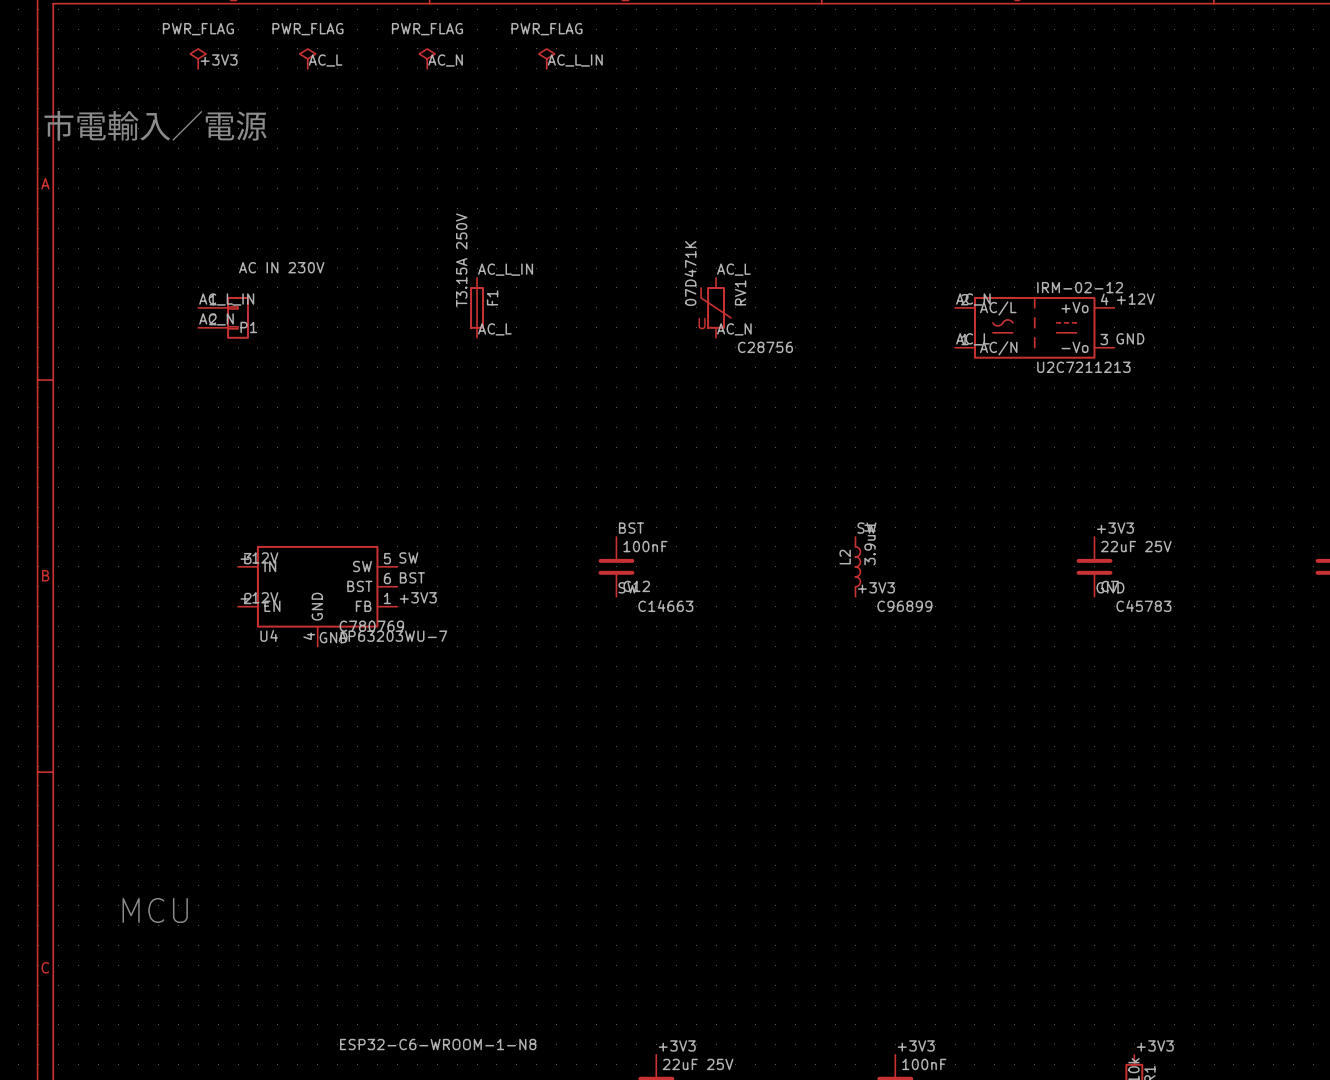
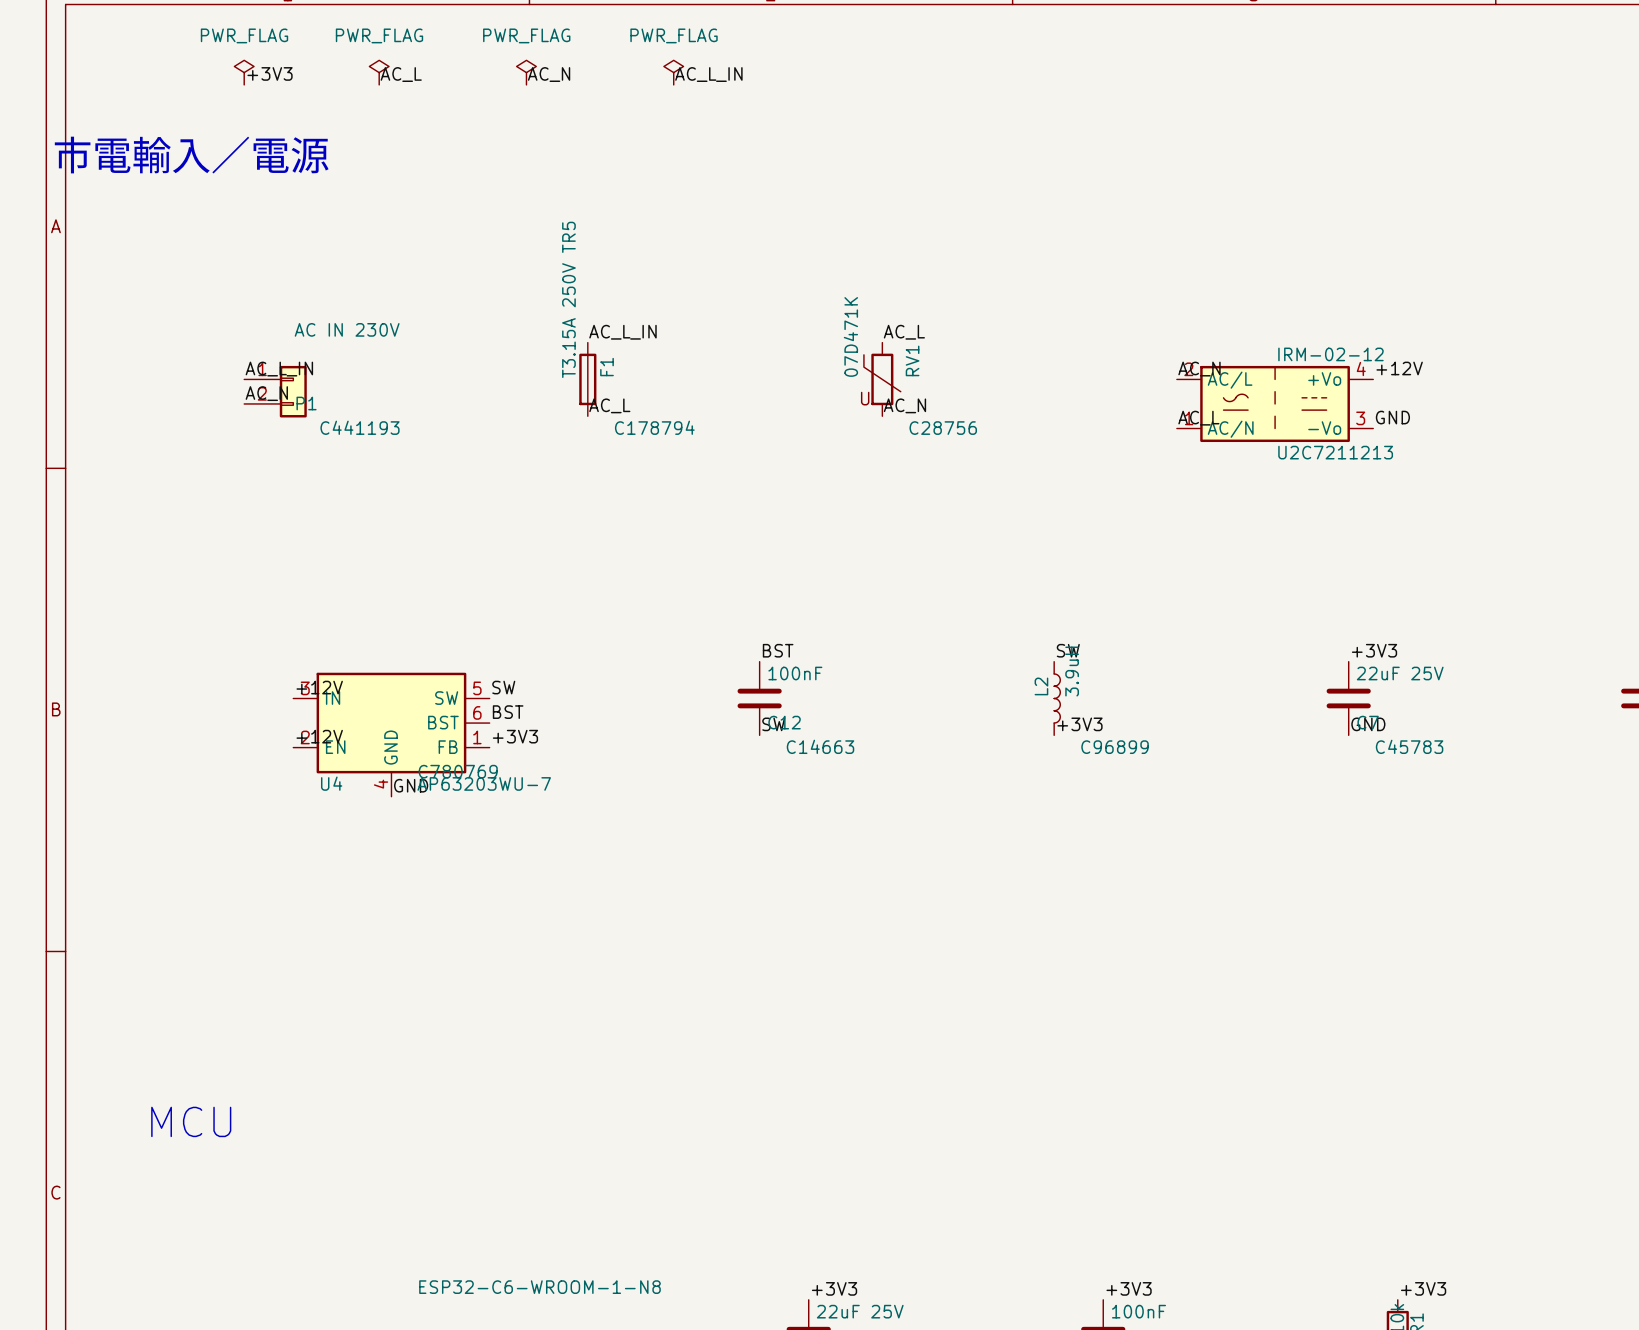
F1 value: T3.15A 250V (461, 260) -> T3.15A 250V TR5 (568, 299)
P1 text: none -> C441193 (360, 427)
F1 text: none -> C178794 (654, 427)

